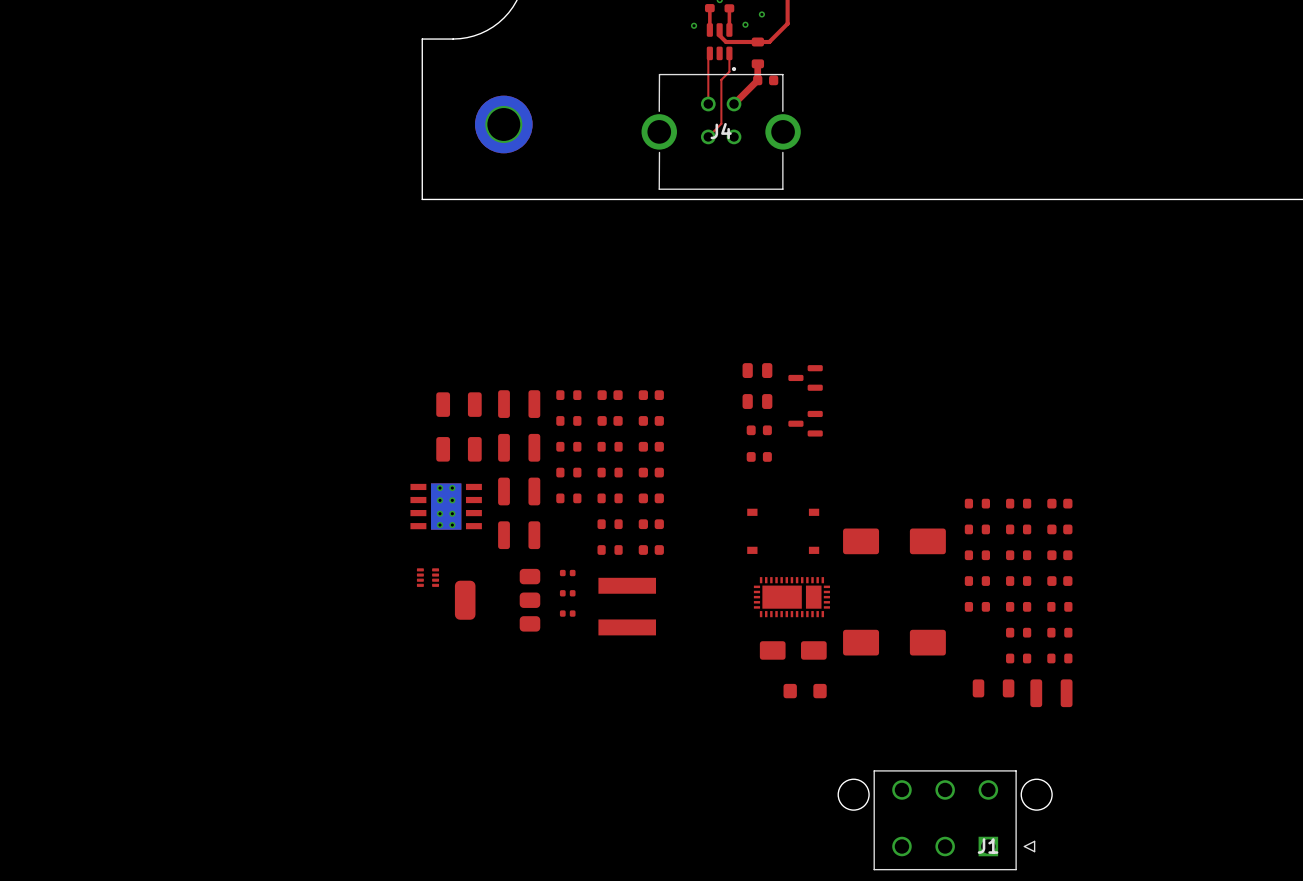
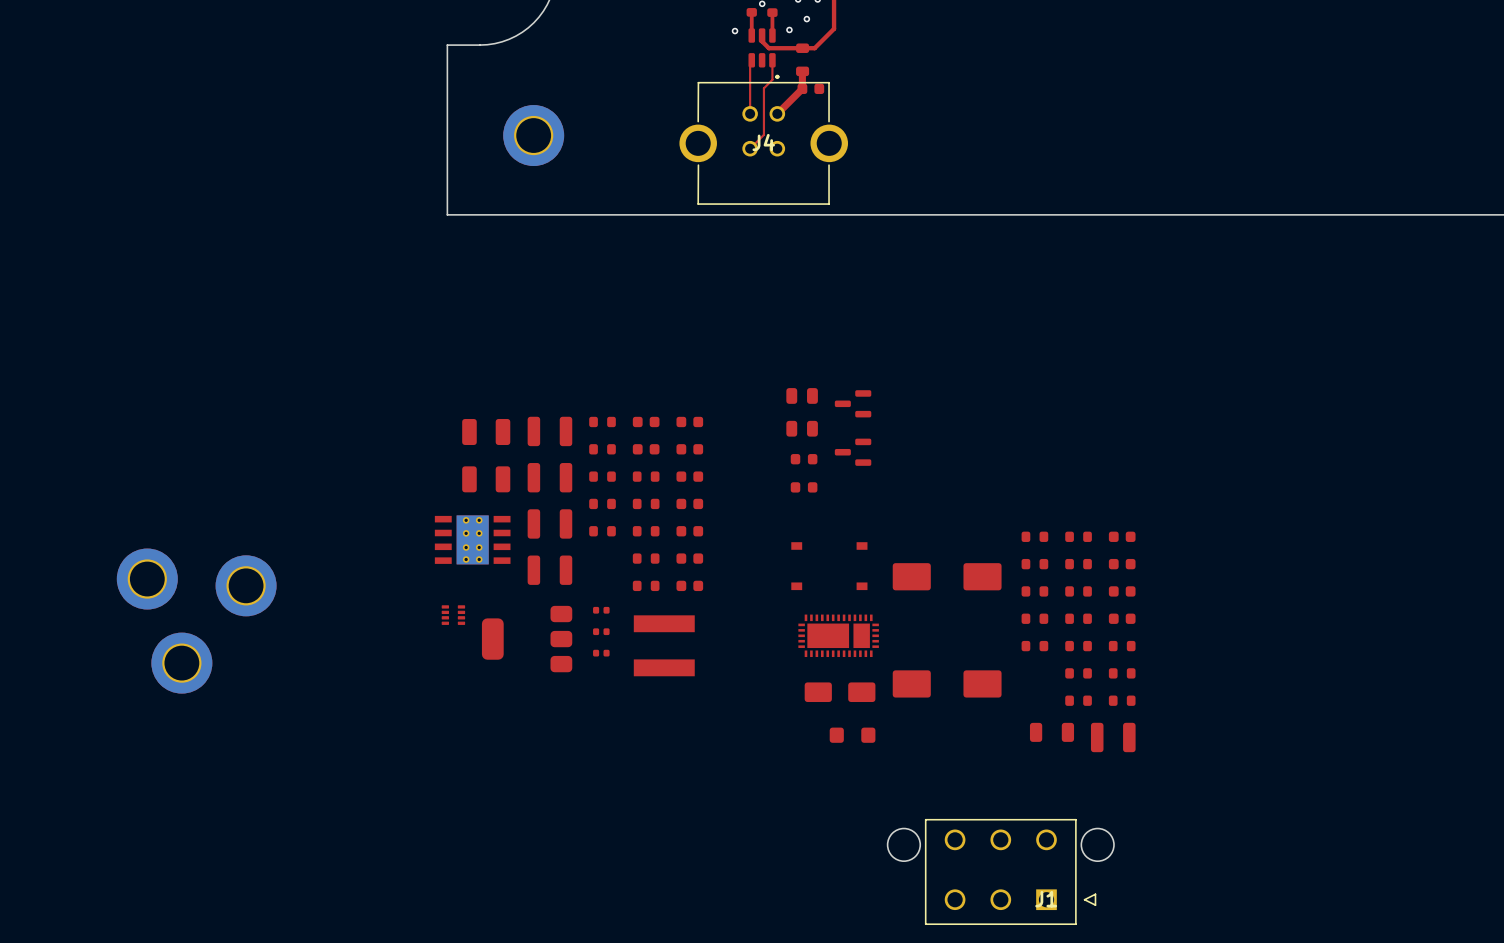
part: none -> (147, 579)
part: none -> (246, 585)
part: none -> (181, 663)

